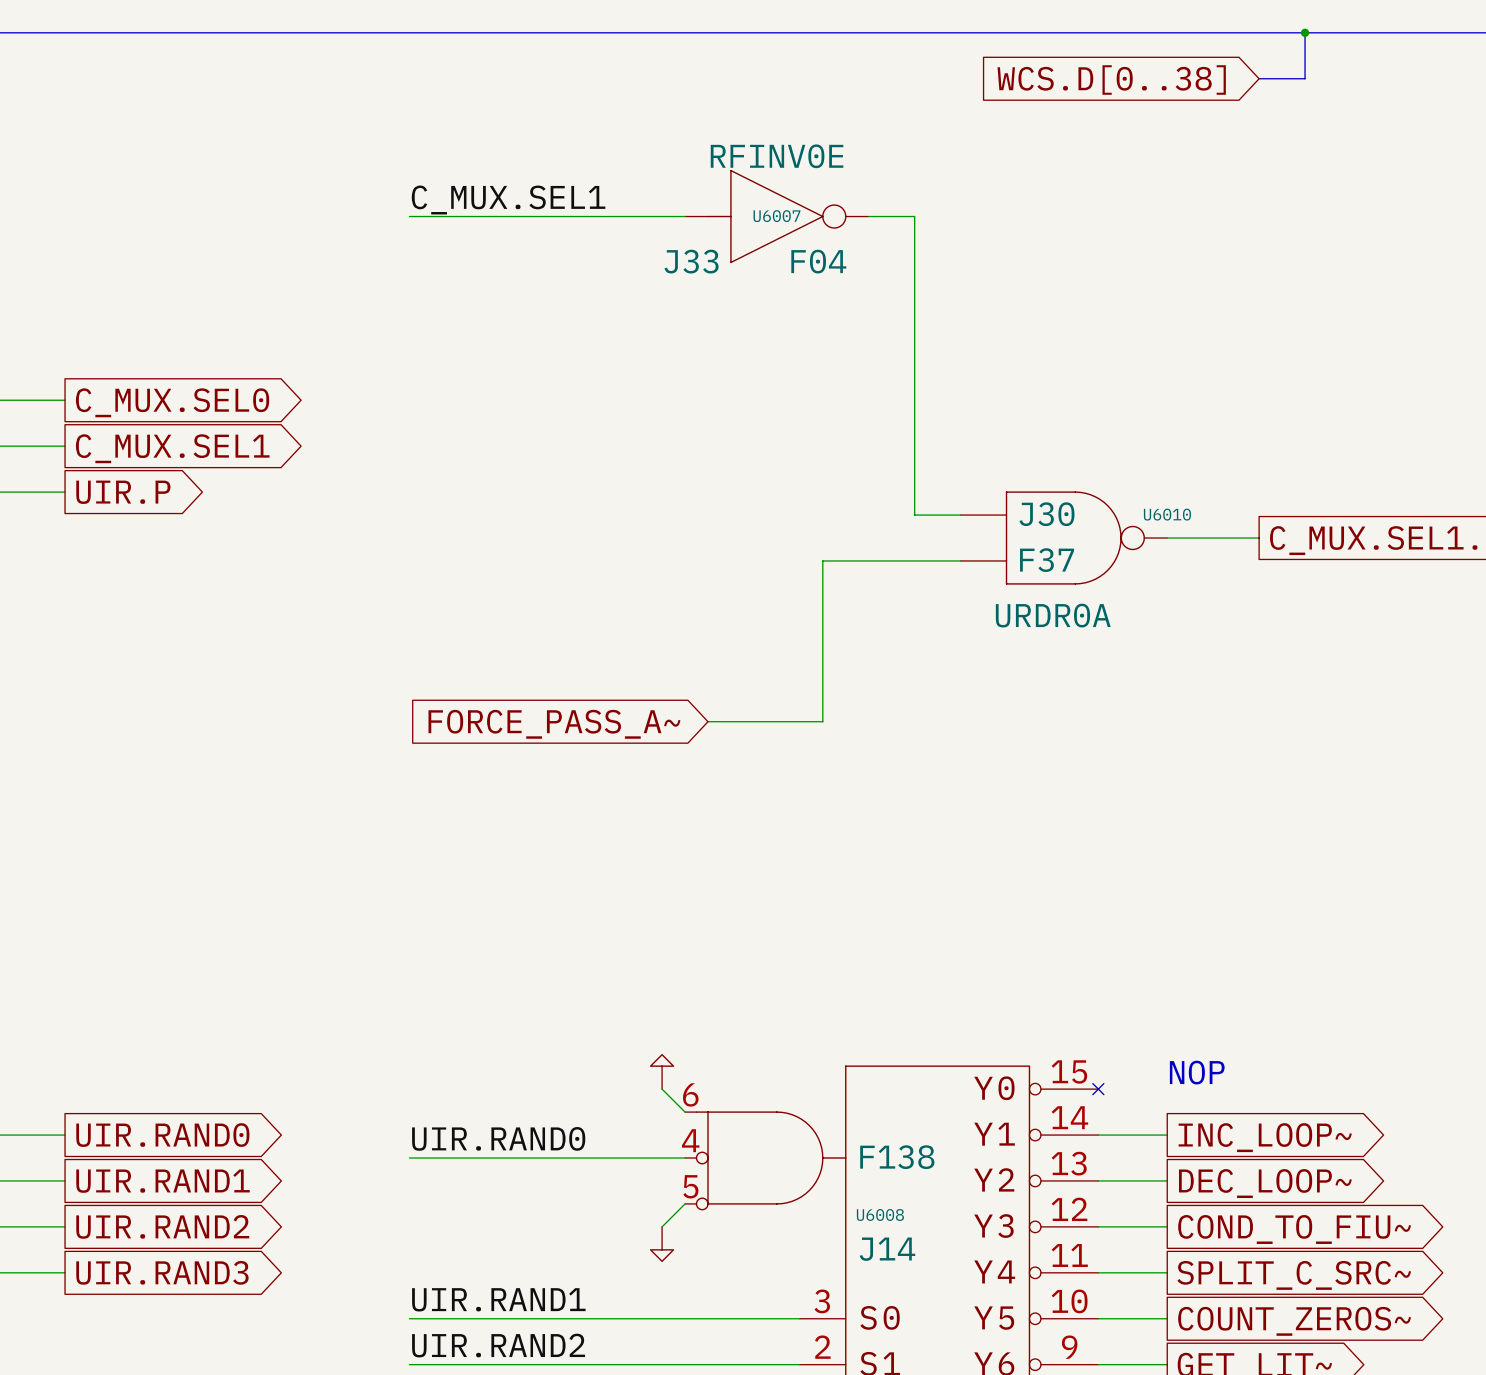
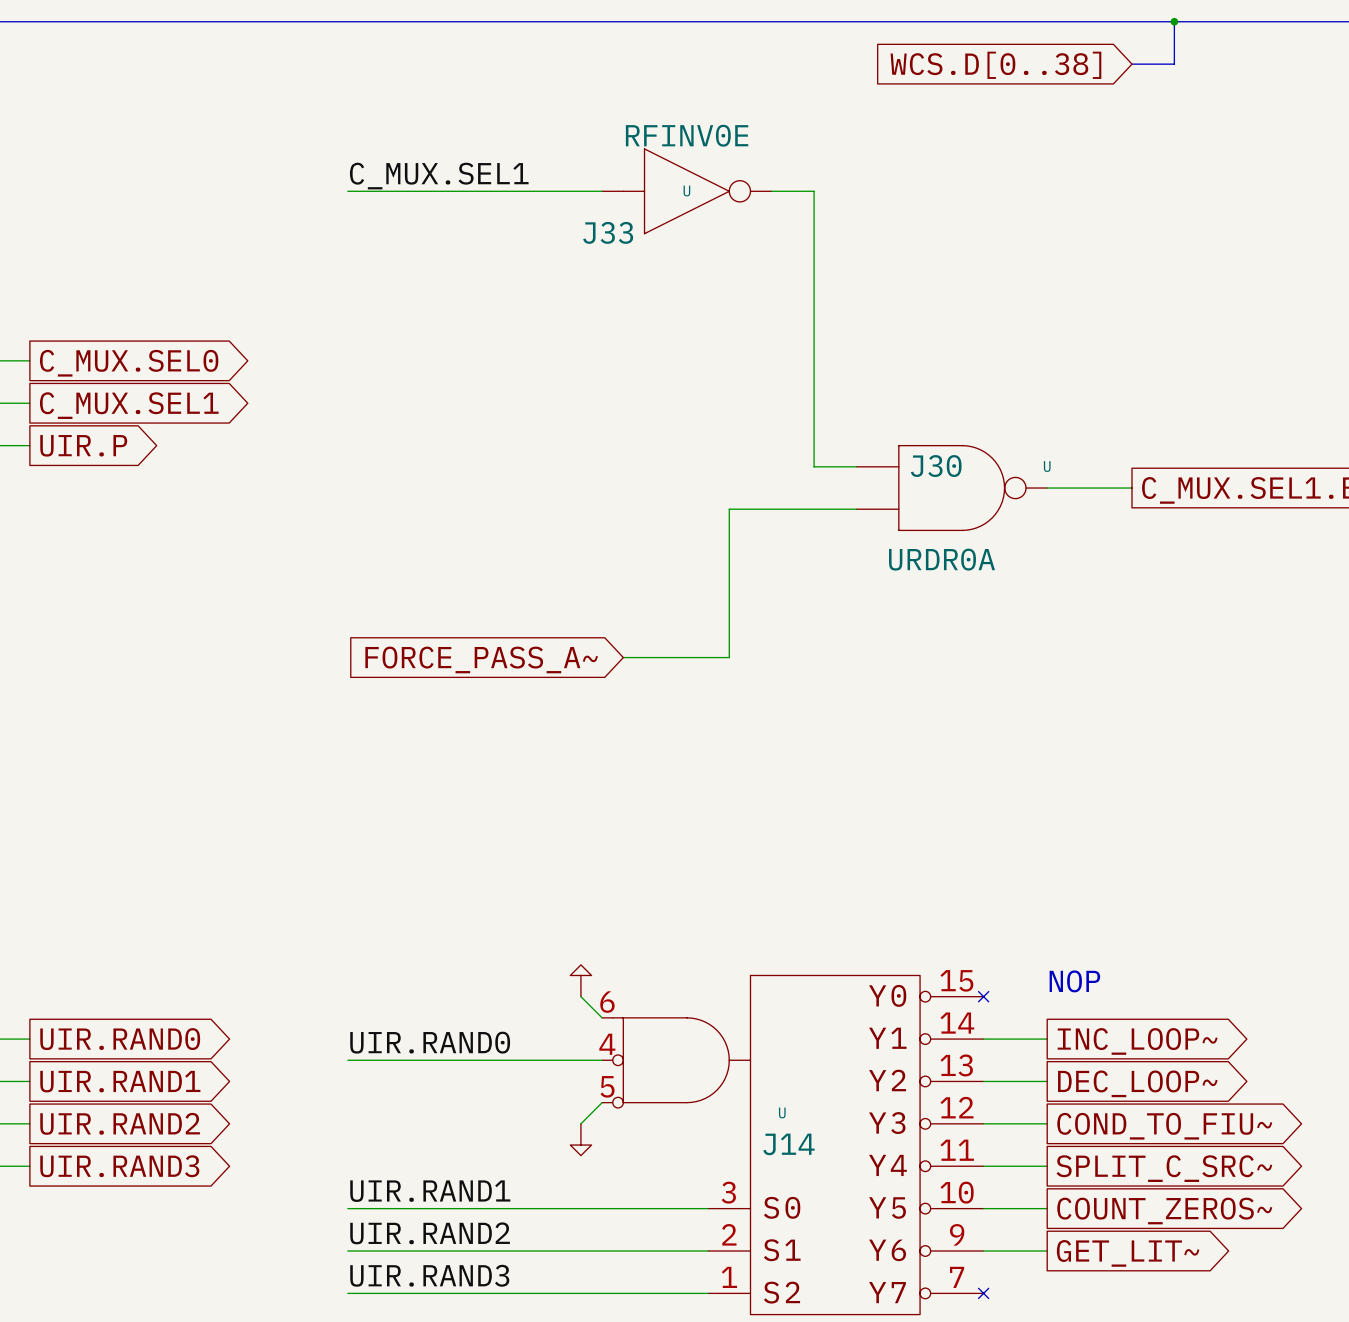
U6007 name: U6007 (776, 216) -> U (686, 191)
U6007 value: F04 (818, 261) -> none
U6010 name: U6010 (1167, 514) -> U (1047, 466)
U6010 value: F37 (1047, 560) -> none
U6008 value: F138 (897, 1157) -> none
U6008 name: U6008 (880, 1214) -> U (782, 1112)

